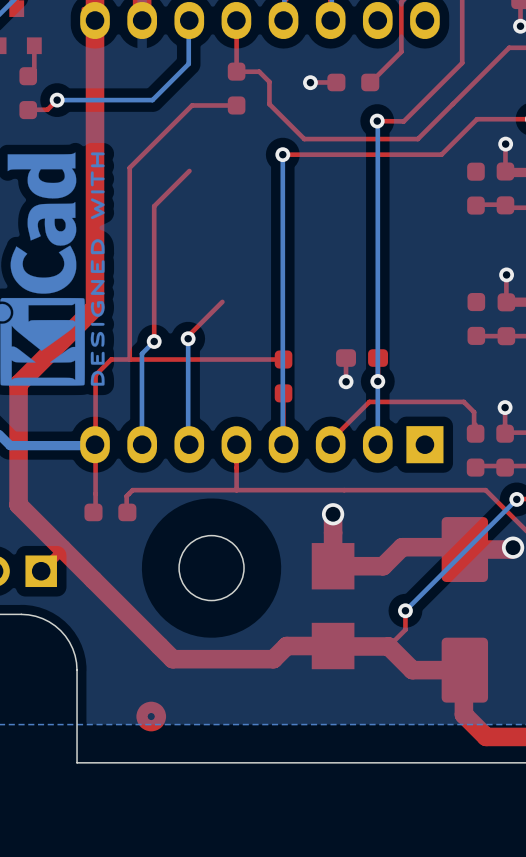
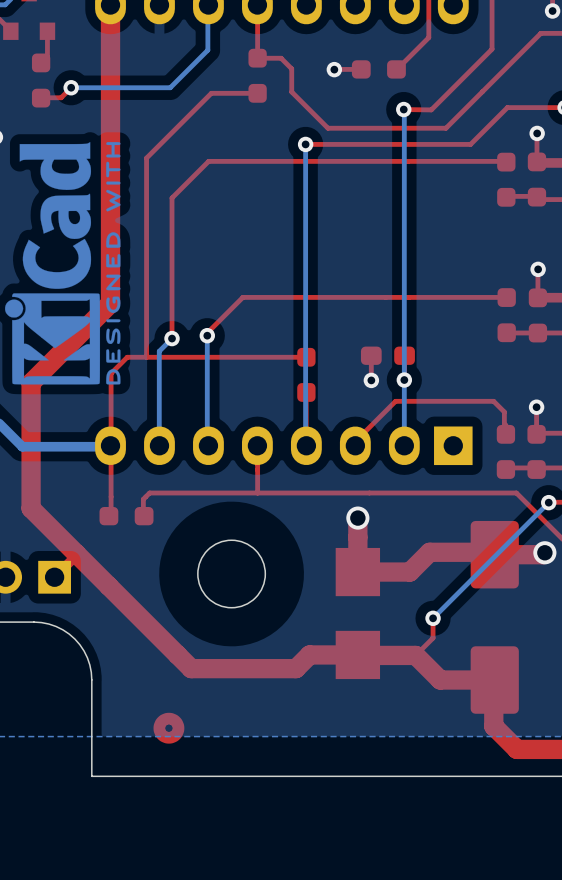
top track: none -> (208, 161) (503, 161) (505, 163)
top track: none -> (506, 297) (242, 297)

